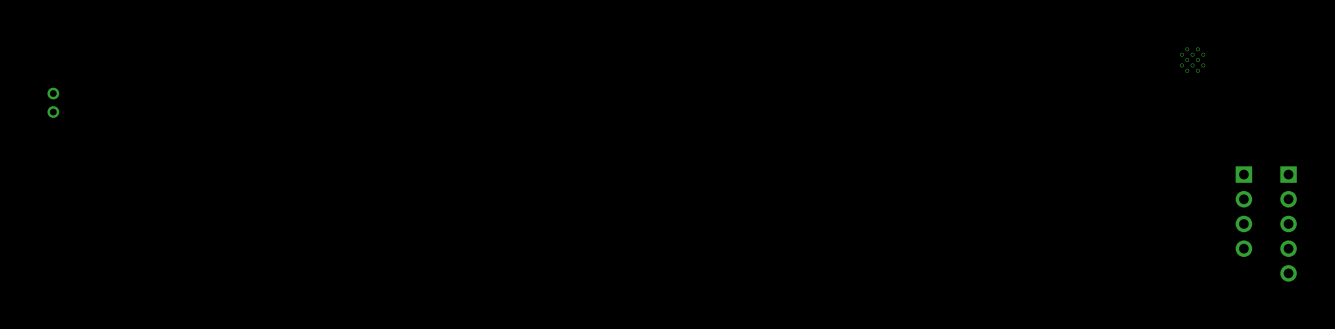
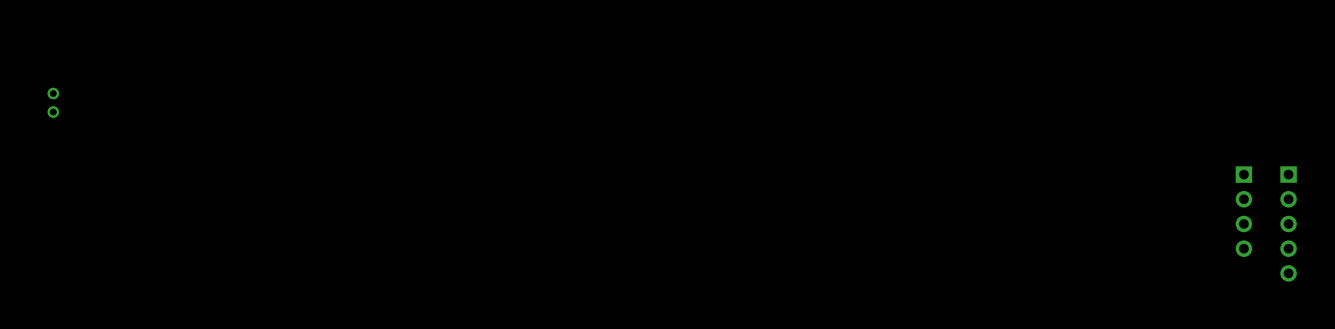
part: (1192, 60) -> none

